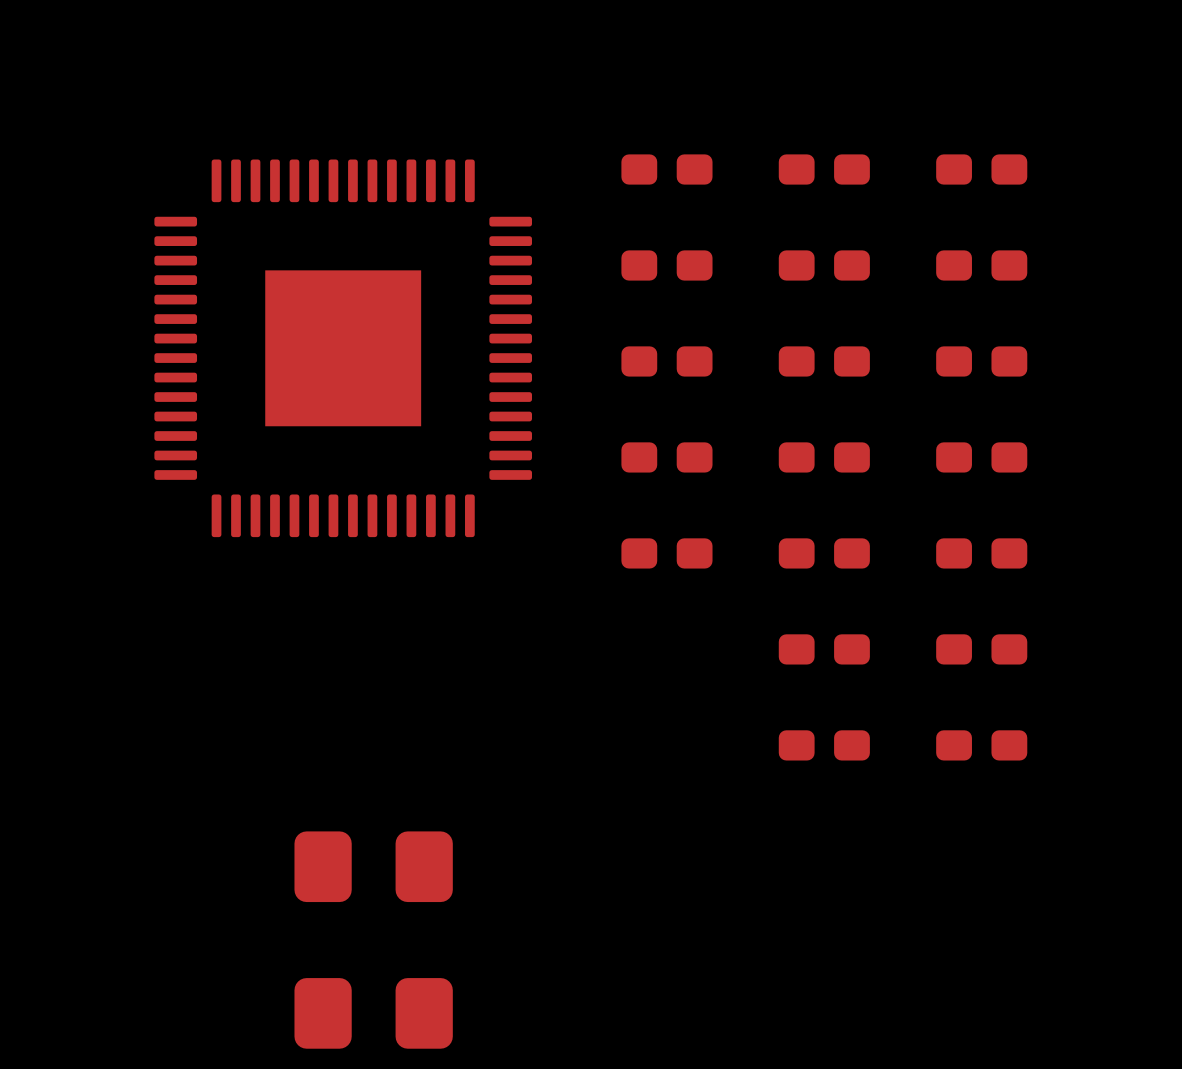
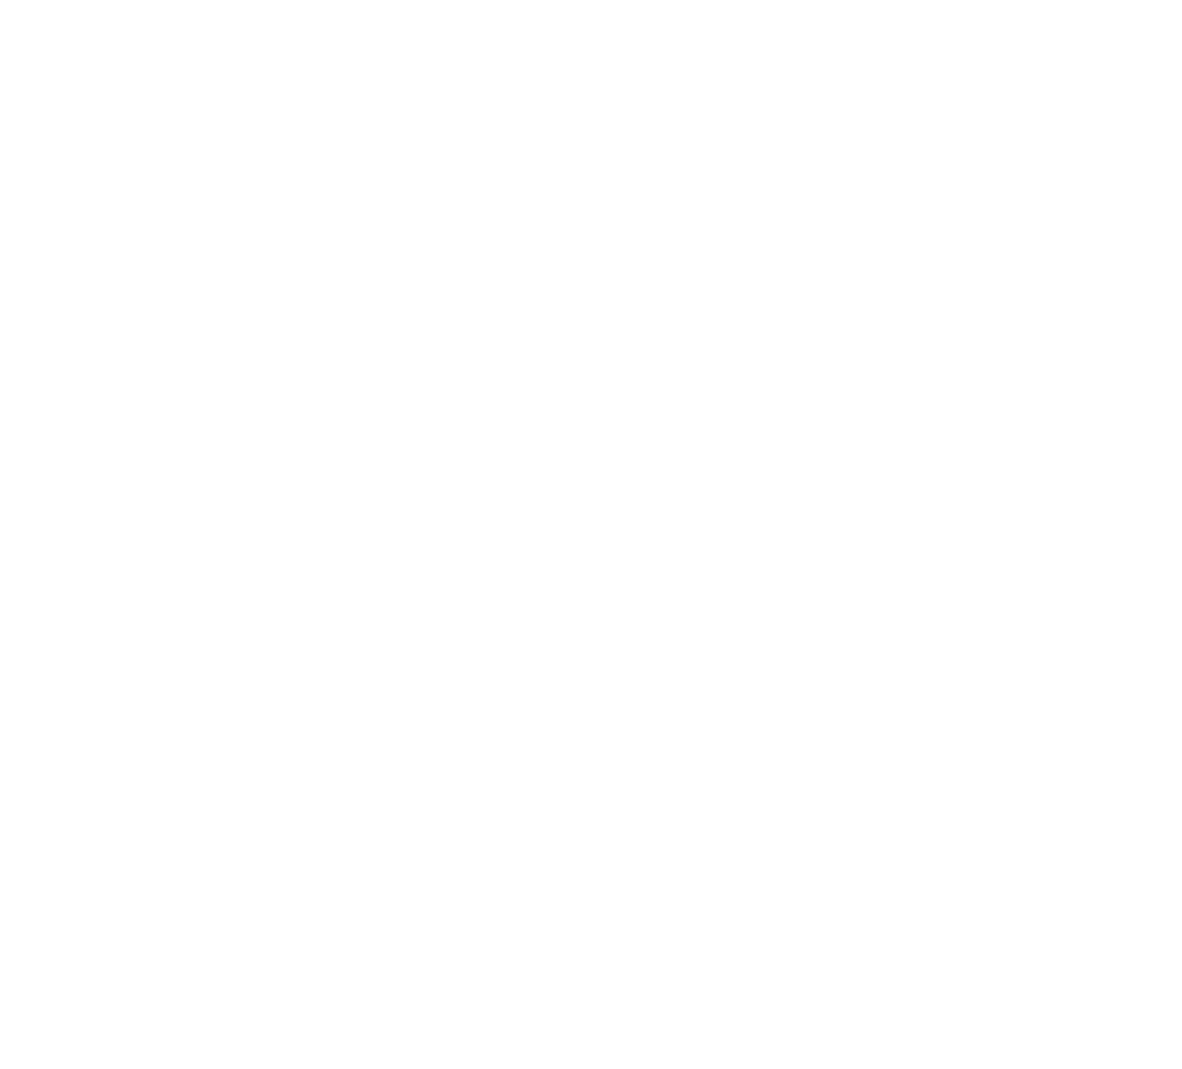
part: (666, 169) -> none
part: (824, 169) -> none
part: (981, 169) -> none
part: (666, 265) -> none
part: (824, 265) -> none
part: (981, 265) -> none
part: (343, 348) -> none
part: (666, 361) -> none
part: (824, 361) -> none
part: (981, 361) -> none
part: (666, 457) -> none
part: (824, 457) -> none
part: (981, 457) -> none
part: (666, 553) -> none
part: (824, 553) -> none
part: (981, 553) -> none
part: (824, 649) -> none
part: (981, 649) -> none
part: (824, 745) -> none
part: (981, 745) -> none
part: (373, 866) -> none
part: (373, 1013) -> none

